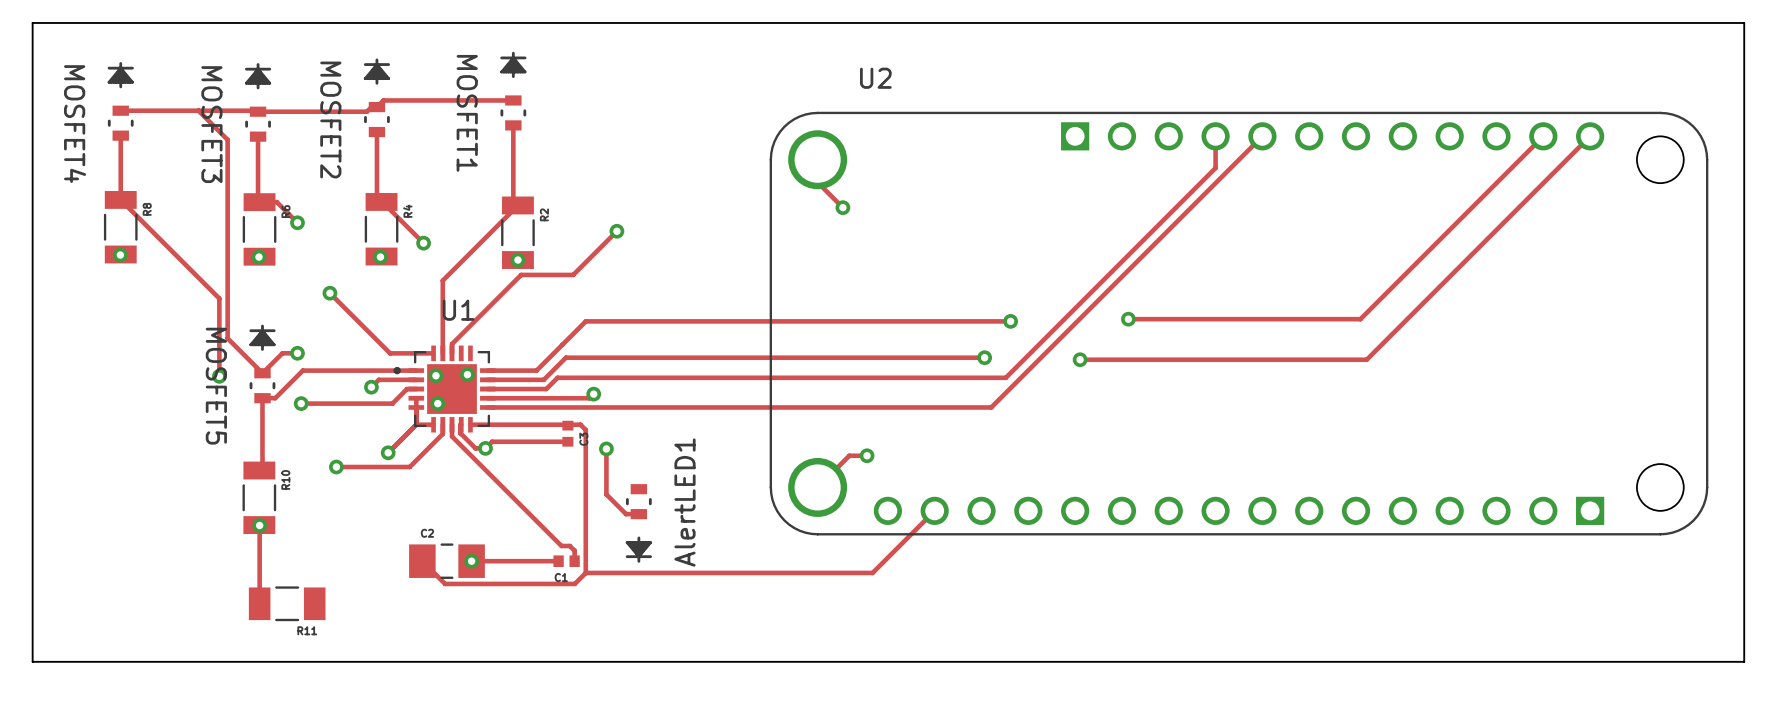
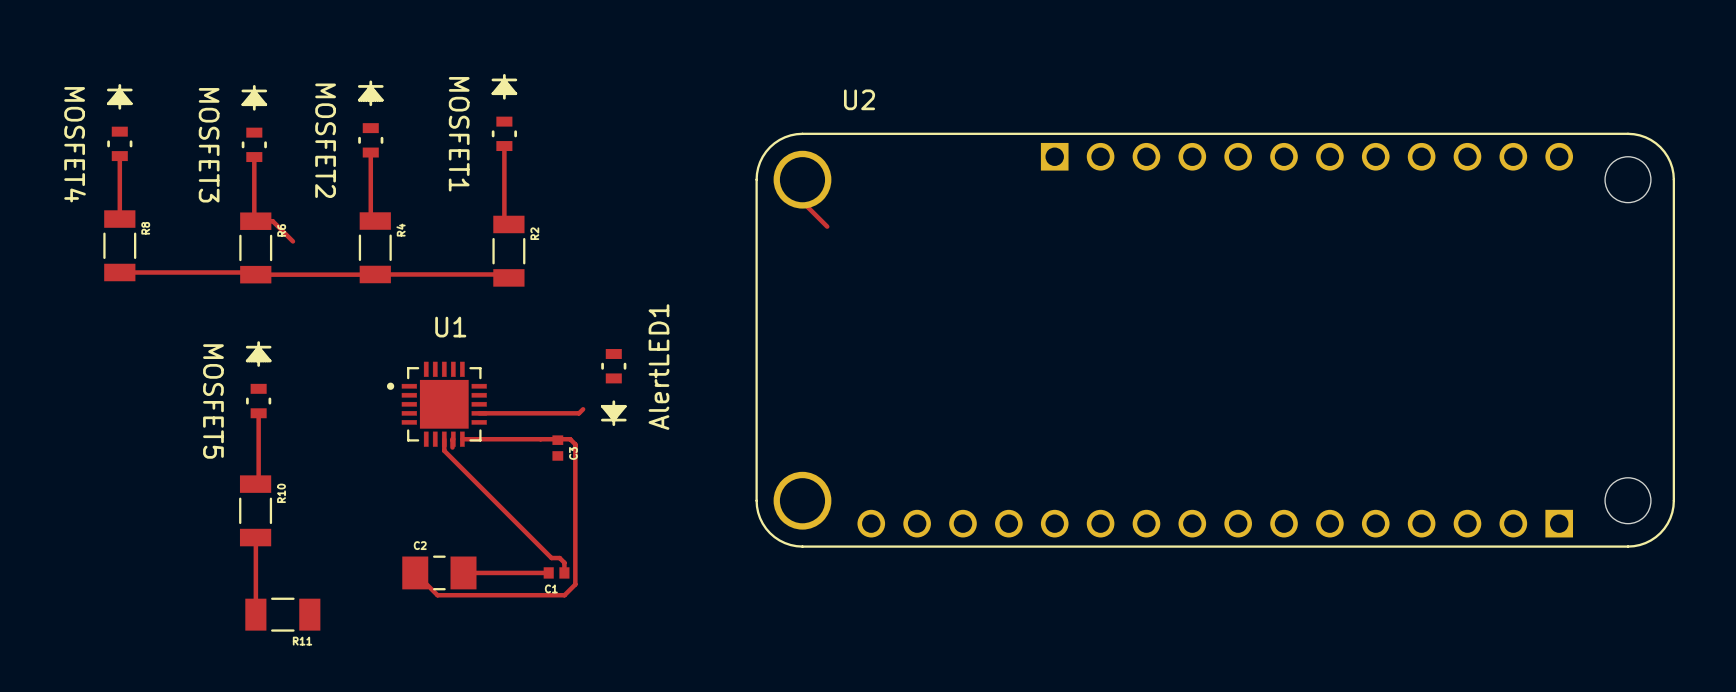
board edge: (32, 22) (1744, 22) (1744, 661) (32, 661) (32, 22) -> none
track: (513, 100) (383, 100) (376, 107) (371, 107) (366, 111) (120, 110) -> none
track: (198, 110) (227, 139) (227, 338) (262, 373) (282, 353) (297, 353) -> none
track: (1215, 136) (1215, 168) (1005, 377) (557, 377) (546, 389) (487, 389) -> none
track: (1262, 136) (991, 407) (487, 407) -> none
track: (1543, 136) (1360, 319) (1128, 319) -> none
track: (1590, 136) (1366, 359) (1080, 359) -> none
track: (120, 199) (219, 298) (219, 376) -> none
track: (381, 201) (423, 243) -> none
track: (517, 205) (442, 280) (442, 353) -> none
via: (842, 207) -> none
via: (297, 222) -> none
track: (616, 231) (573, 274) (521, 274) (452, 344) (452, 353) -> none
via: (616, 231) -> none
via: (423, 243) -> none
track: none -> (119, 272) (375, 274)
via: (120, 255) -> none
track: none -> (375, 274) (505, 274) (508, 277)
via: (258, 257) -> none
via: (380, 257) -> none
via: (517, 260) -> none
track: (329, 293) (390, 353) (433, 353) -> none
via: (329, 293) -> none
via: (1128, 319) -> none
track: (1010, 321) (585, 321) (536, 370) (487, 370) -> none
via: (1010, 321) -> none
via: (297, 353) -> none
track: (984, 357) (565, 357) (543, 379) (487, 379) -> none
via: (984, 357) -> none
via: (1080, 359) -> none
track: (416, 370) (302, 370) (275, 398) (262, 398) -> none
via: (467, 374) -> none
via: (435, 375) -> none
via: (219, 376) -> none
track: (416, 379) (378, 379) (371, 387) -> none
via: (371, 387) -> none
track: (416, 389) (407, 389) (392, 403) (301, 403) -> none
via: (593, 394) -> none
track: (416, 398) (416, 424) (388, 452) -> none
via: (301, 403) -> none
via: (437, 403) -> none
track: (416, 424) (433, 424) -> none
track: (442, 424) (442, 434) (409, 467) (336, 467) -> none
track: (460, 433) (475, 448) (485, 448) (492, 441) (567, 441) -> none
via: (485, 448) -> none
track: (606, 448) (606, 494) (626, 514) (638, 514) -> none
via: (606, 448) -> none
via: (388, 452) -> none
track: (867, 455) (849, 455) (817, 487) -> none
via: (867, 455) -> none
via: (336, 467) -> none
track: (934, 510) (872, 572) (585, 572) -> none
AlertLED1 position: (638, 523) -> (613, 387)
via: (259, 525) -> none
via: (471, 561) -> none

